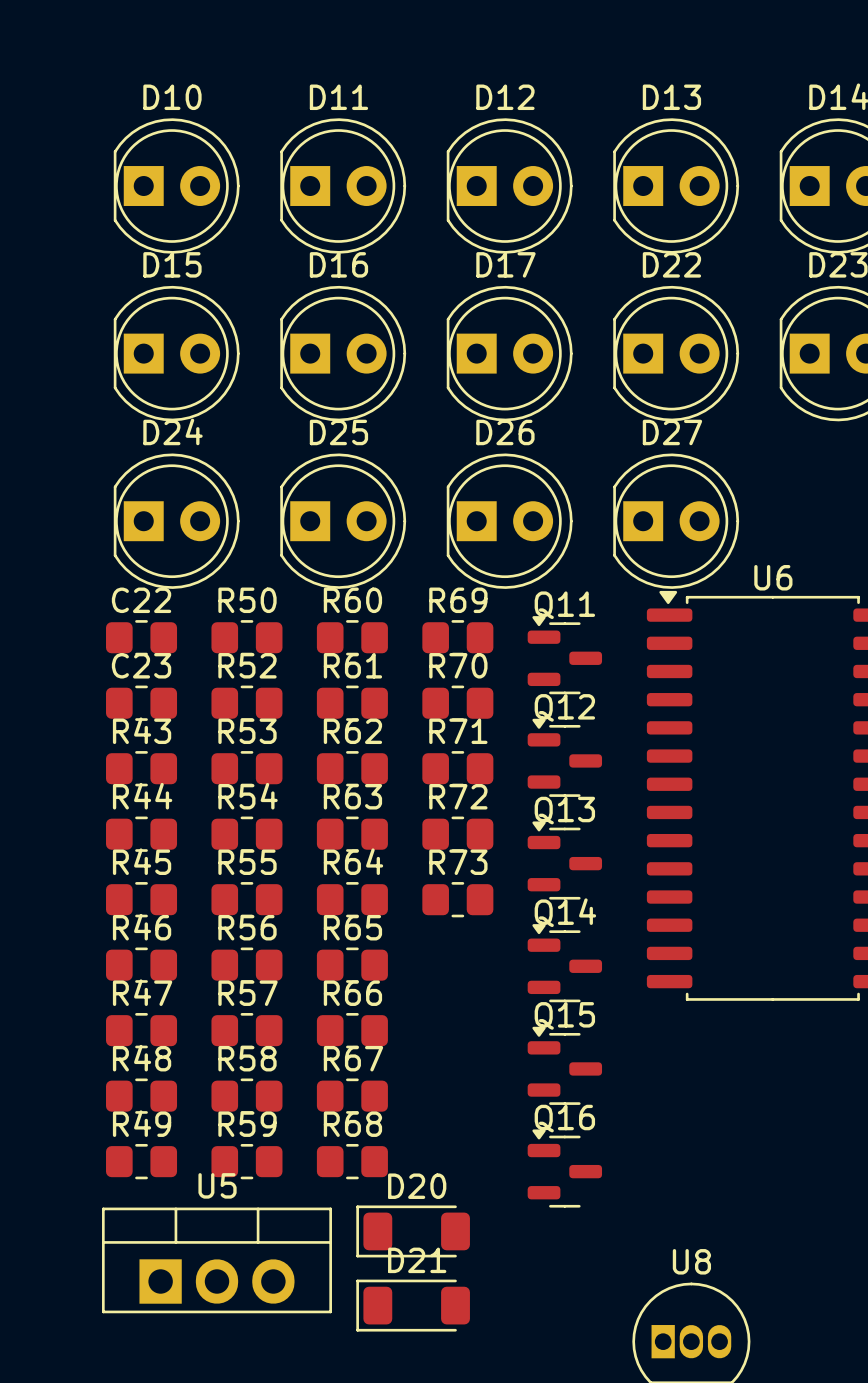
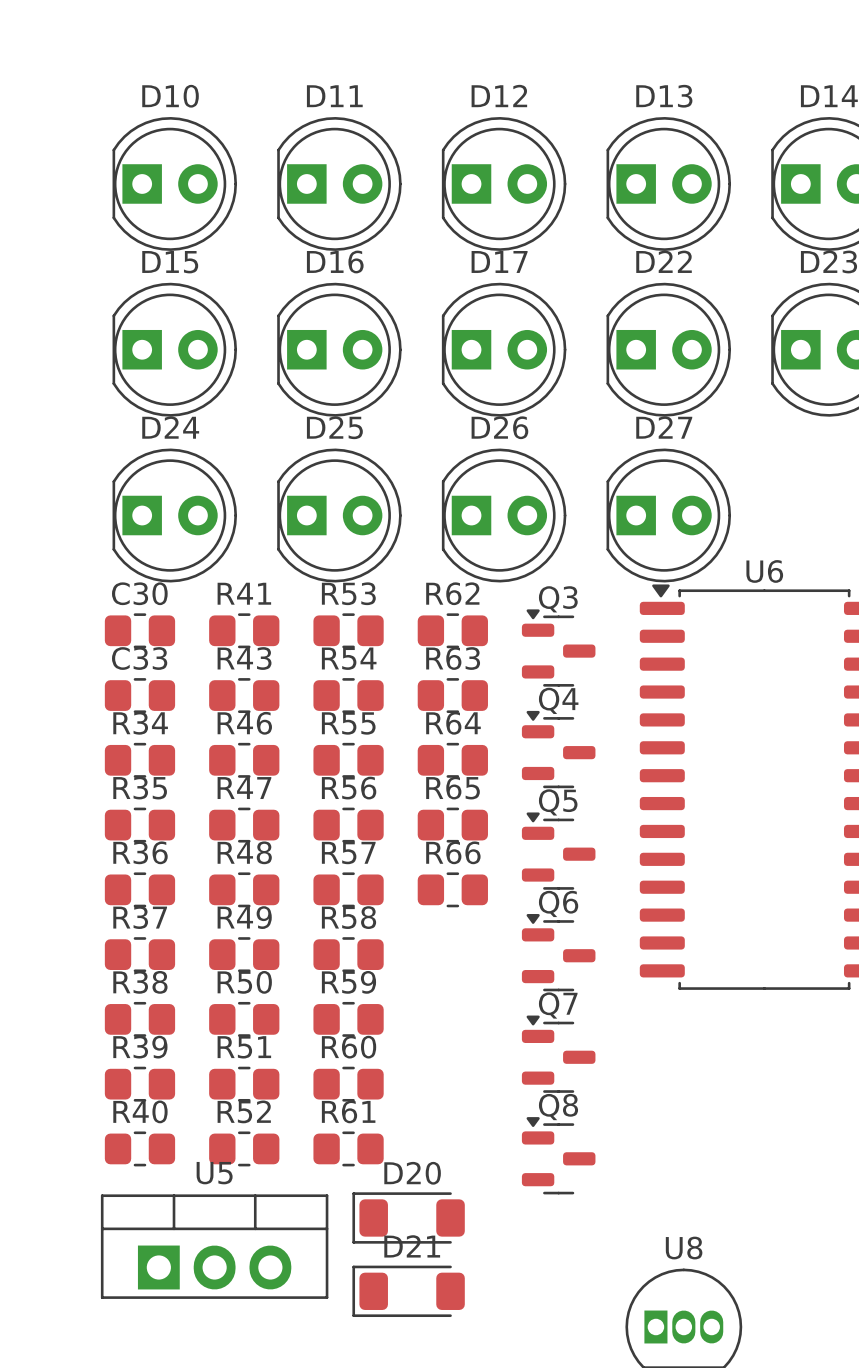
C22 name: C22 (141, 600) -> C30 (139, 593)
R50 name: R50 (247, 600) -> R41 (244, 593)
R60 name: R60 (352, 600) -> R53 (348, 593)
R69 name: R69 (458, 600) -> R62 (452, 593)
Q11 name: Q11 (564, 605) -> Q3 (558, 599)
C23 name: C23 (141, 665) -> C33 (139, 658)
R52 name: R52 (247, 665) -> R43 (244, 658)
R61 name: R61 (352, 665) -> R54 (349, 658)
R70 name: R70 (458, 665) -> R63 (453, 658)
Q12 name: Q12 (564, 707) -> Q4 (558, 700)
R43 name: R43 (142, 730) -> R34 (140, 723)
R53 name: R53 (247, 731) -> R46 (244, 723)
R62 name: R62 (352, 731) -> R55 (348, 723)
R71 name: R71 (458, 731) -> R64 (453, 723)
R44 name: R44 (142, 796) -> R35 (140, 788)
R54 name: R54 (248, 796) -> R47 (244, 788)
R63 name: R63 (352, 796) -> R56 (349, 788)
R72 name: R72 (458, 796) -> R65 (453, 788)
Q13 name: Q13 (564, 810) -> Q5 (558, 802)
R45 name: R45 (142, 861) -> R36 (140, 852)
R64 name: R64 (353, 861) -> R57 (348, 853)
R55 name: R55 (247, 862) -> R48 (244, 852)
R73 name: R73 (458, 862) -> R66 (453, 852)
Q14 name: Q14 (565, 912) -> Q6 (558, 903)
R46 name: R46 (142, 927) -> R37 (140, 917)
R56 name: R56 (247, 927) -> R49 (244, 917)
R65 name: R65 (352, 927) -> R58 (349, 917)
R47 name: R47 (142, 992) -> R38 (140, 982)
R57 name: R57 (248, 993) -> R50 (244, 982)
R66 name: R66 (352, 993) -> R59 (348, 982)
Q15 name: Q15 (564, 1015) -> Q7 (558, 1005)
R48 name: R48 (142, 1058) -> R39 (140, 1047)
R58 name: R58 (247, 1058) -> R51 (244, 1047)
R67 name: R67 (353, 1058) -> R60 (349, 1047)
Q16 name: Q16 (564, 1118) -> Q8 (558, 1107)
R49 name: R49 (142, 1123) -> R40 (140, 1111)
R59 name: R59 (247, 1124) -> R52 (244, 1111)
R68 name: R68 (352, 1124) -> R61 (348, 1111)

